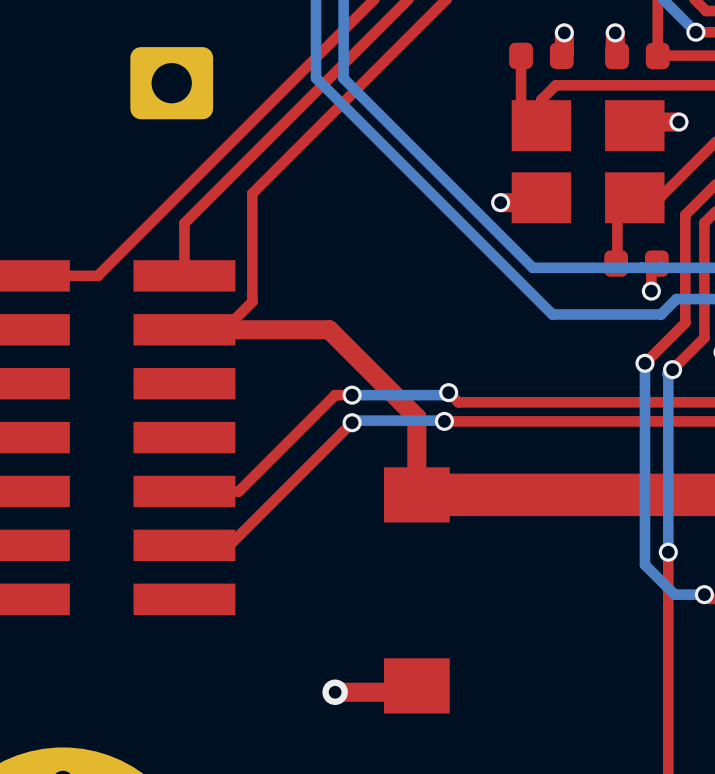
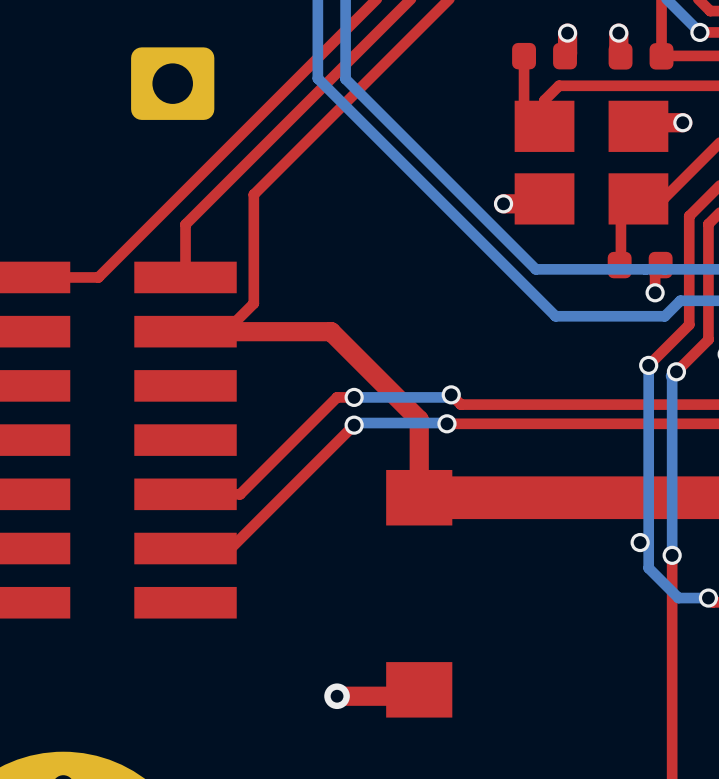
via: none -> (640, 542)

